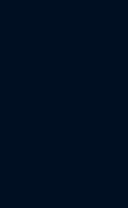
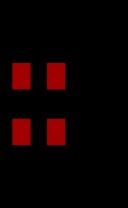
part: none -> (38, 76)
part: none -> (38, 132)

